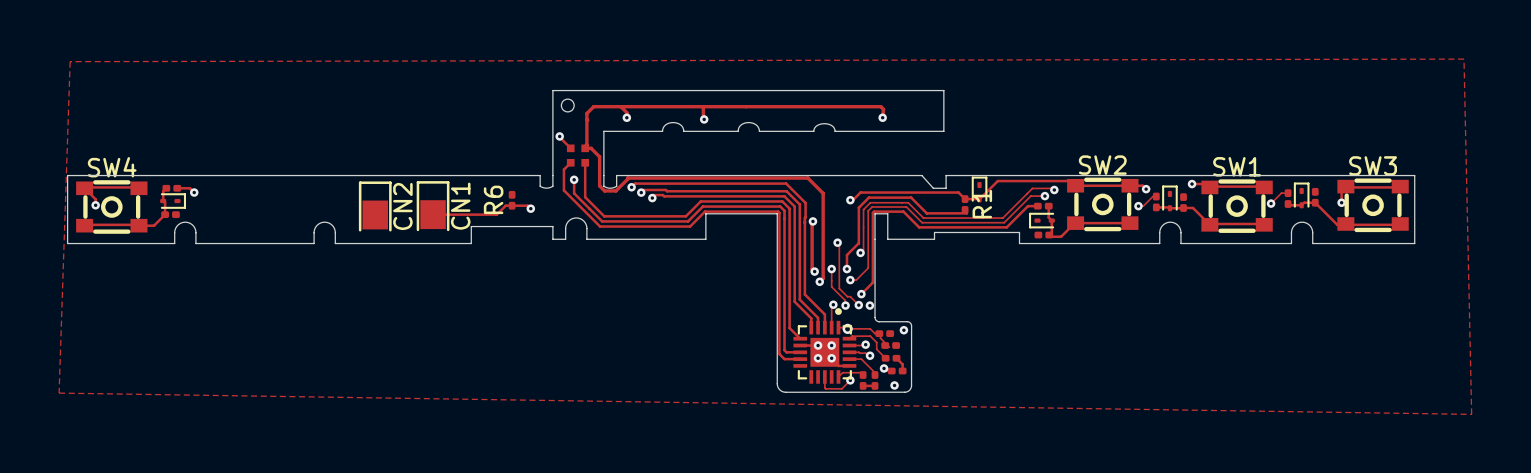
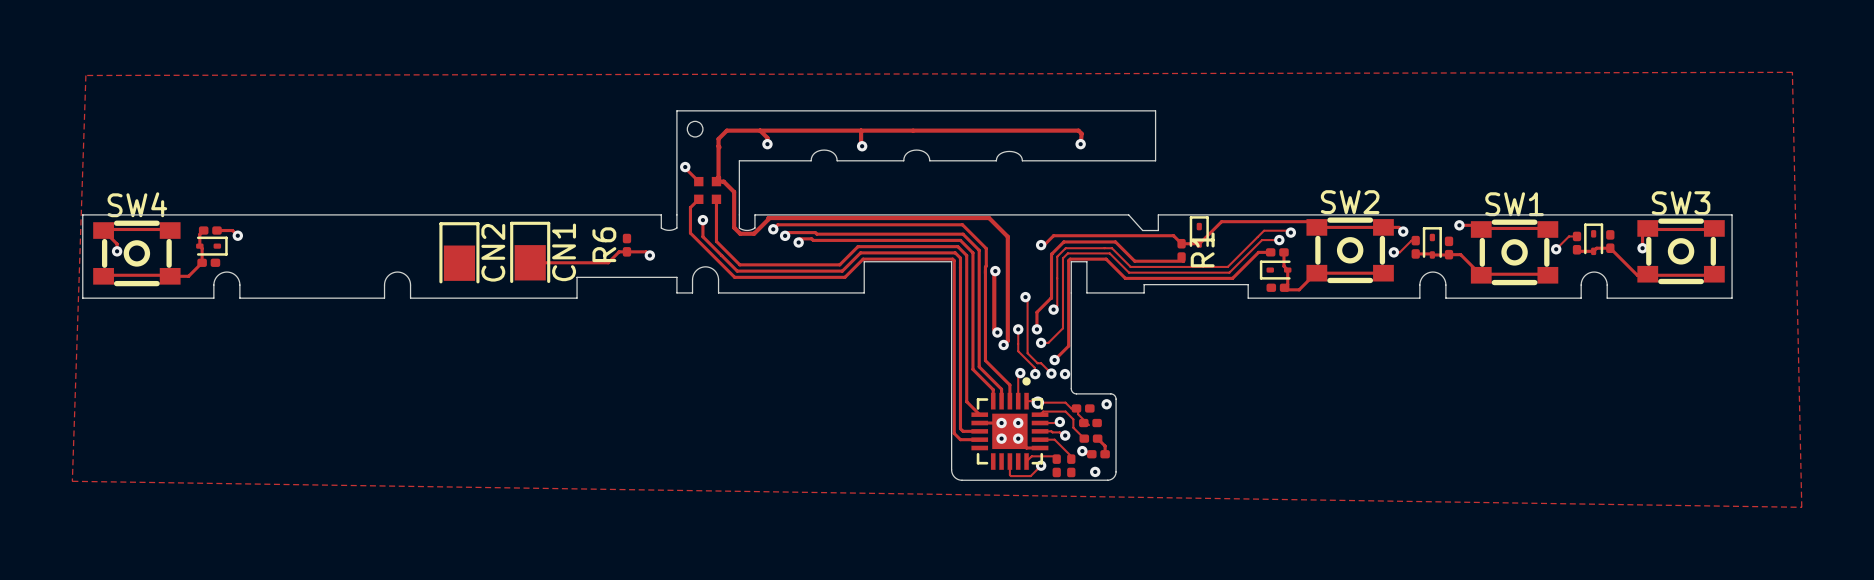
track: (863, 385) (875, 385) -> none

